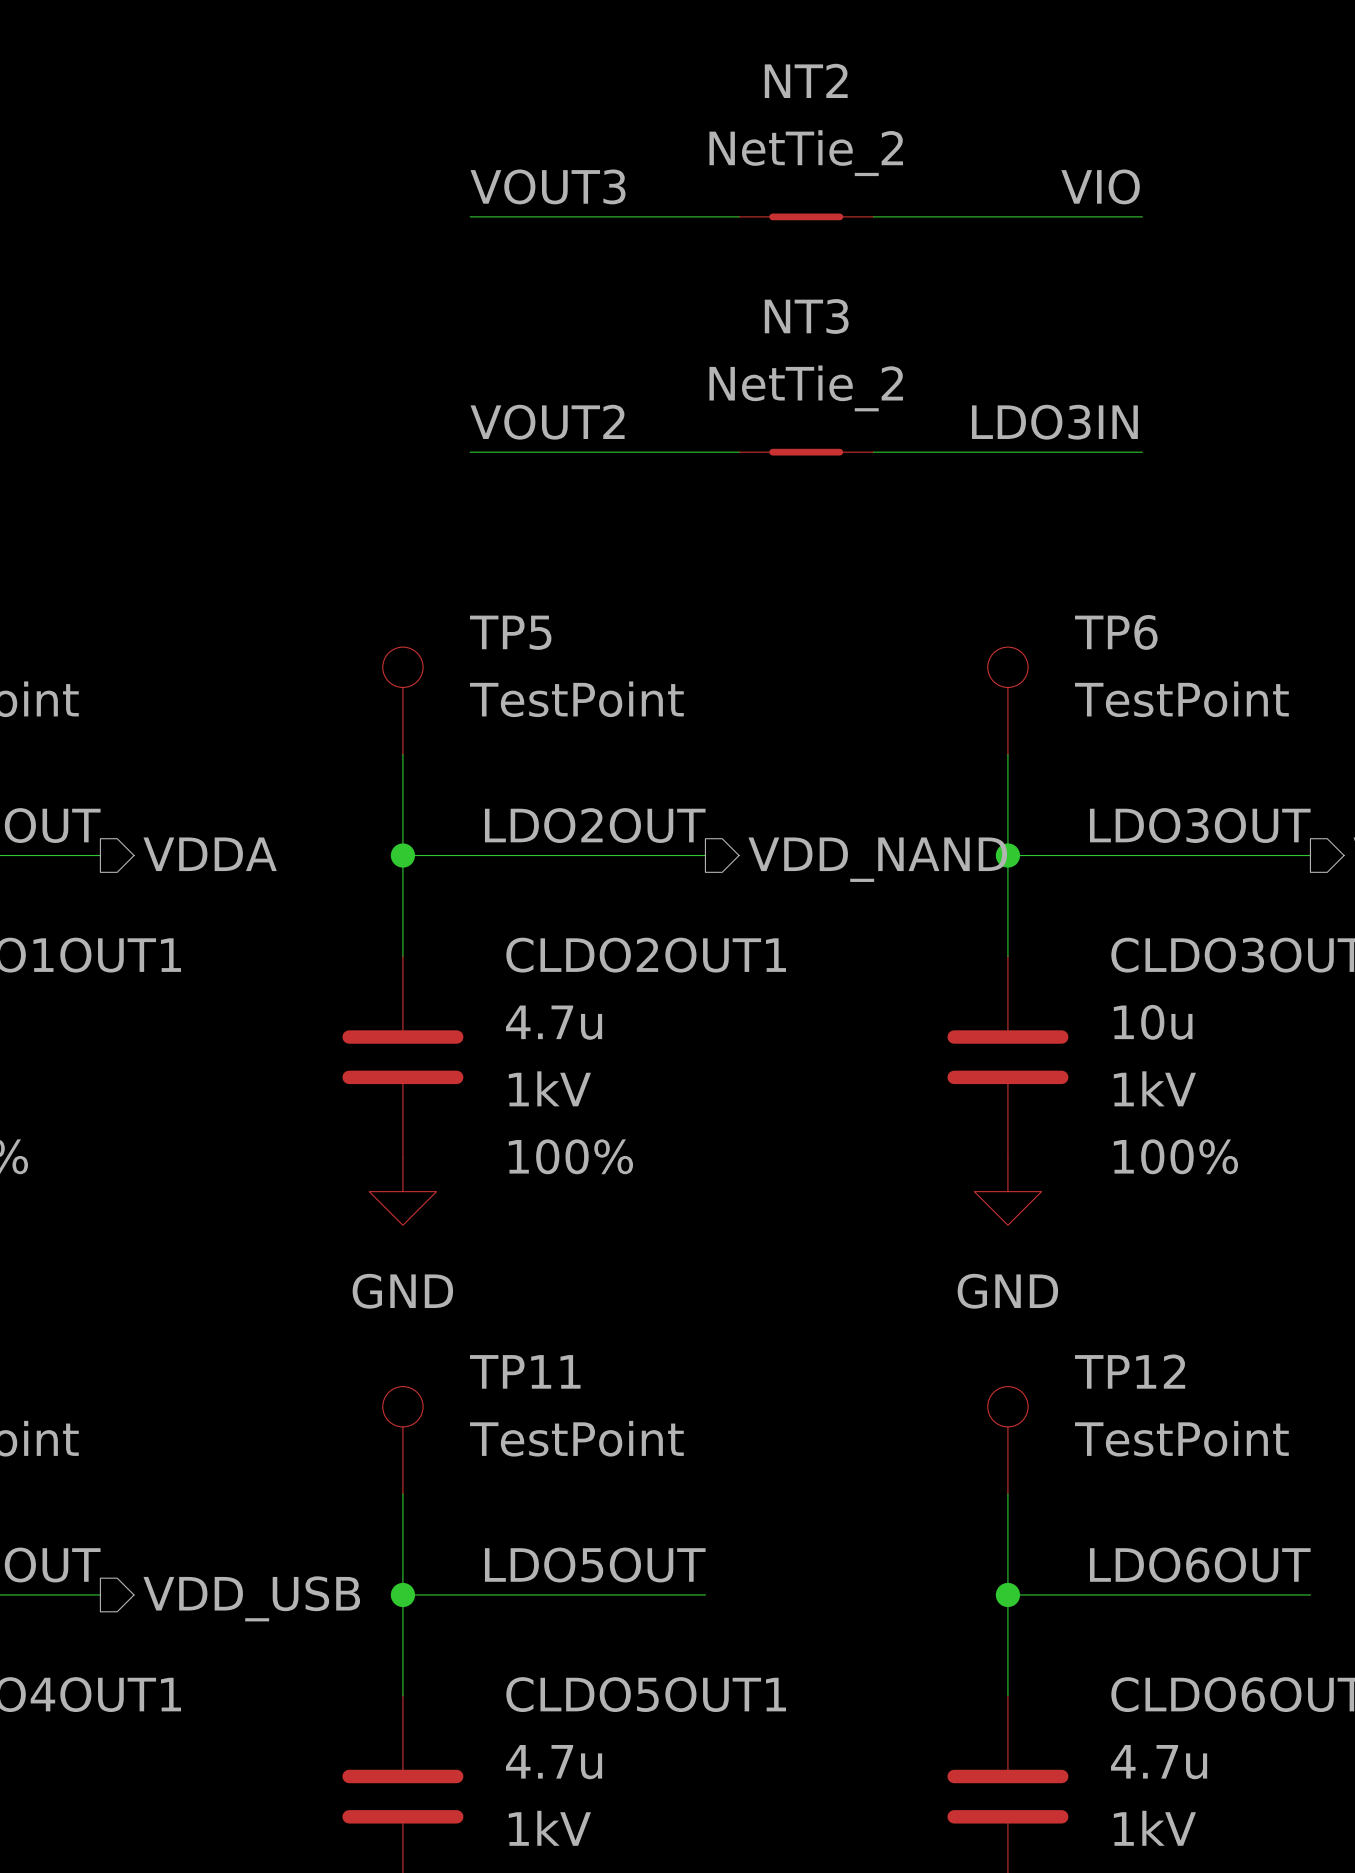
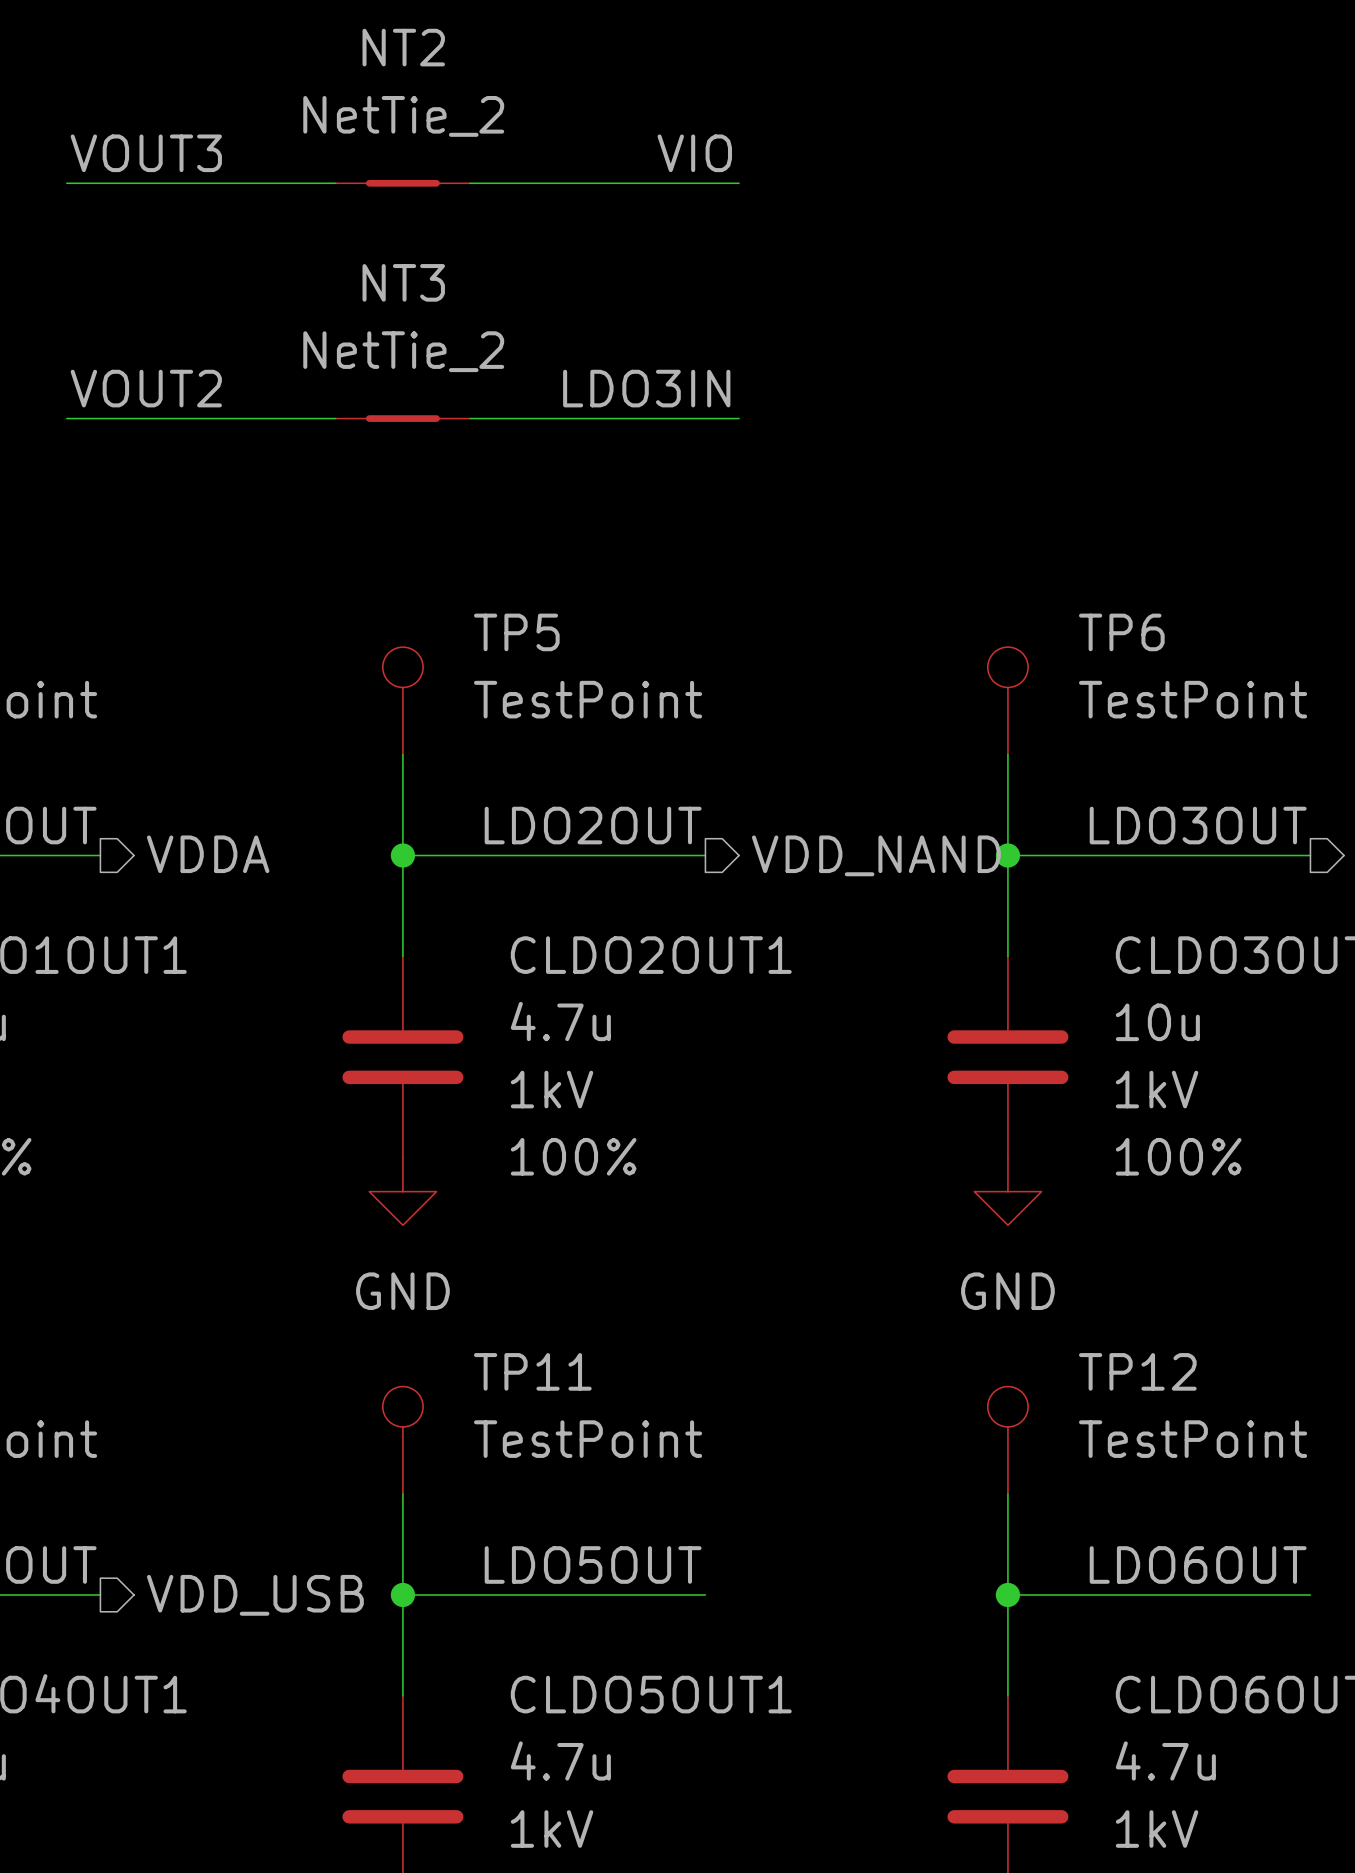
label position: VOUT3 (548, 186) -> VOUT3 (146, 153)
label position: VIO (1100, 186) -> VIO (694, 153)
wire: (470, 216) (739, 216) -> (66, 183) (335, 183)
NT2 position: (806, 216) -> (402, 183)
wire: (873, 216) (1142, 216) -> (470, 183) (739, 183)
label position: VOUT2 (547, 422) -> VOUT2 (146, 388)
label position: LDO3IN (1054, 422) -> LDO3IN (646, 388)
wire: (470, 452) (739, 452) -> (66, 418) (335, 418)
NT3 position: (806, 452) -> (402, 418)
wire: (873, 452) (1142, 452) -> (470, 418) (739, 418)

